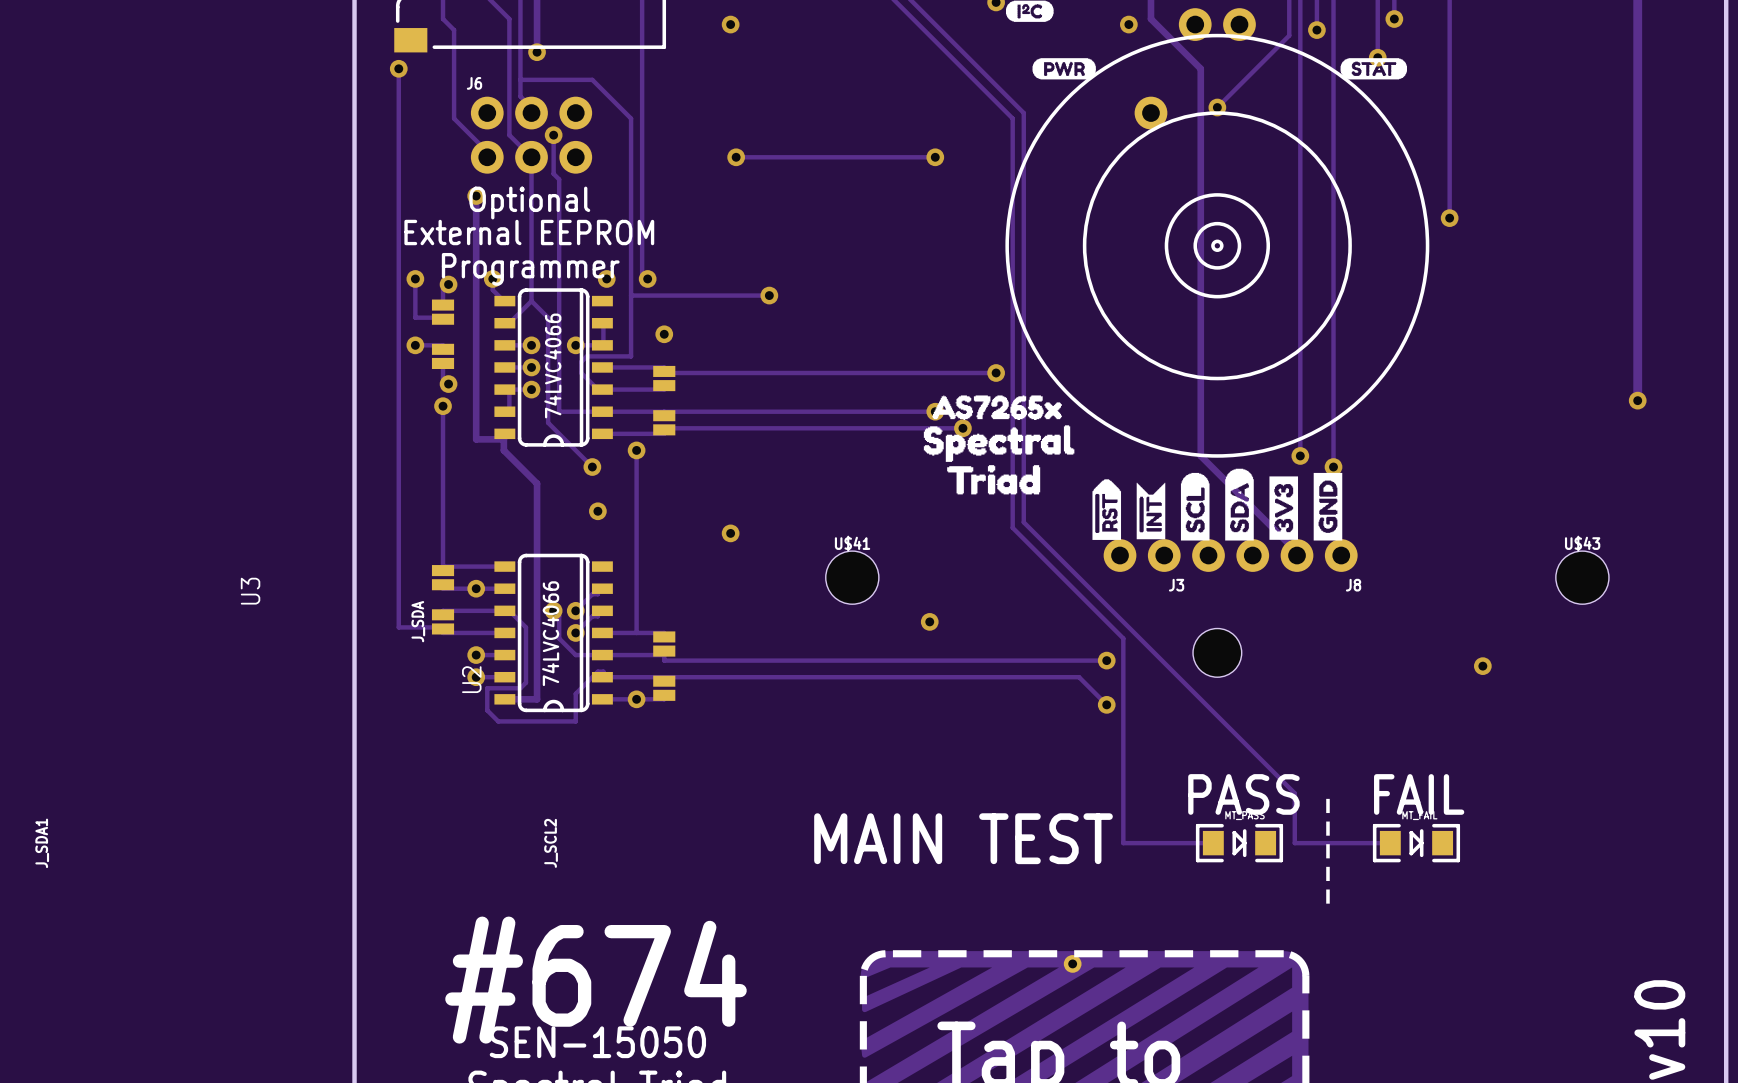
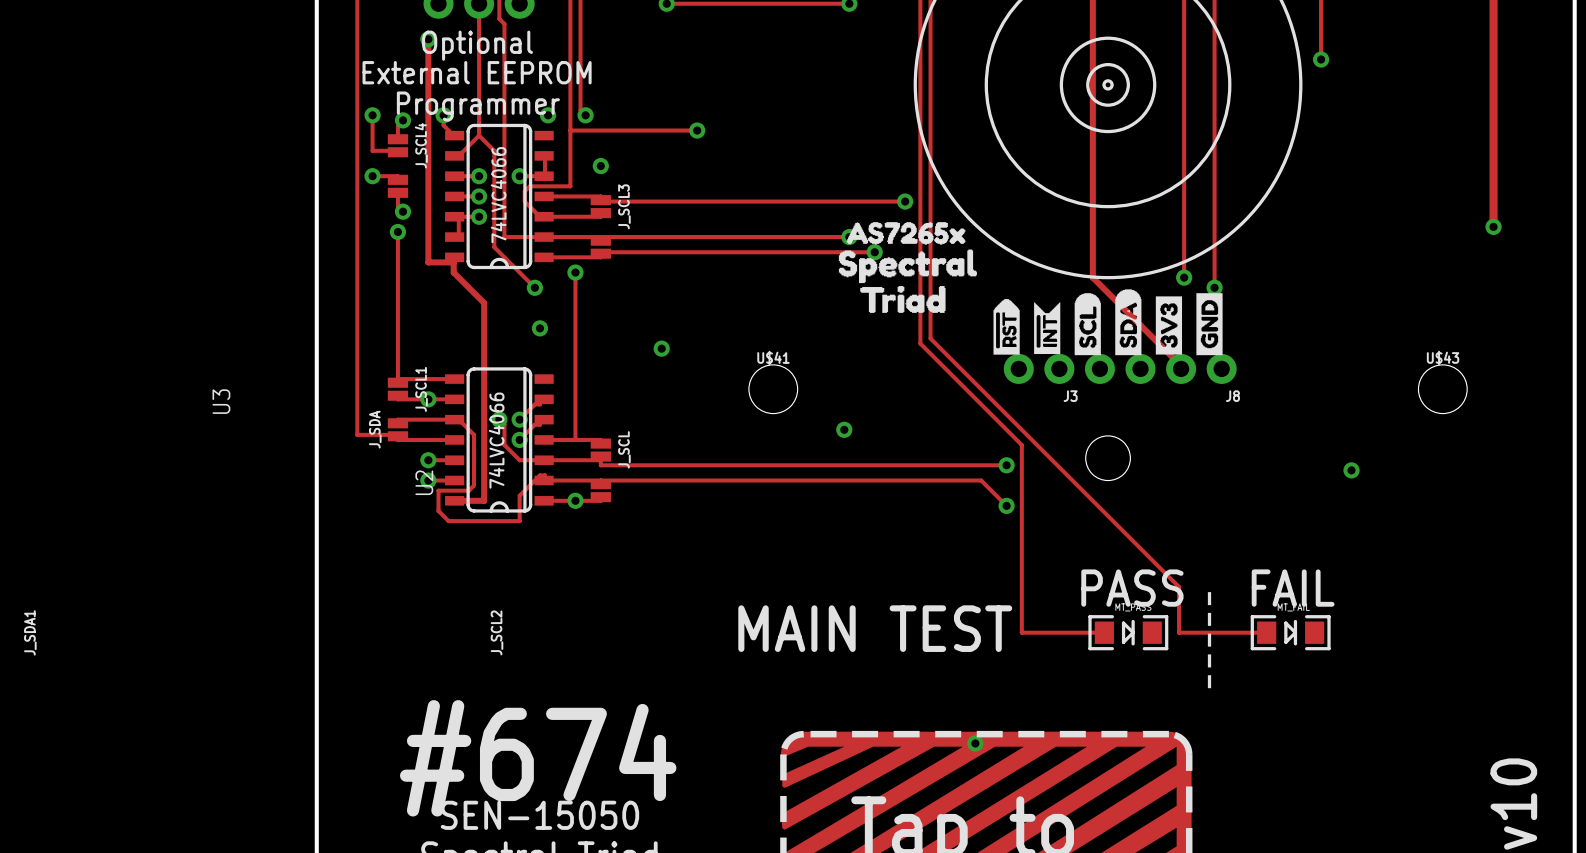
J_SCL4 name: none -> J_SCL4 (421, 145)
J_SCL3 name: none -> J_SCL3 (624, 206)
J_SCL1 name: none -> J_SCL1 (421, 389)
J_SCL name: none -> J_SCL (624, 449)

